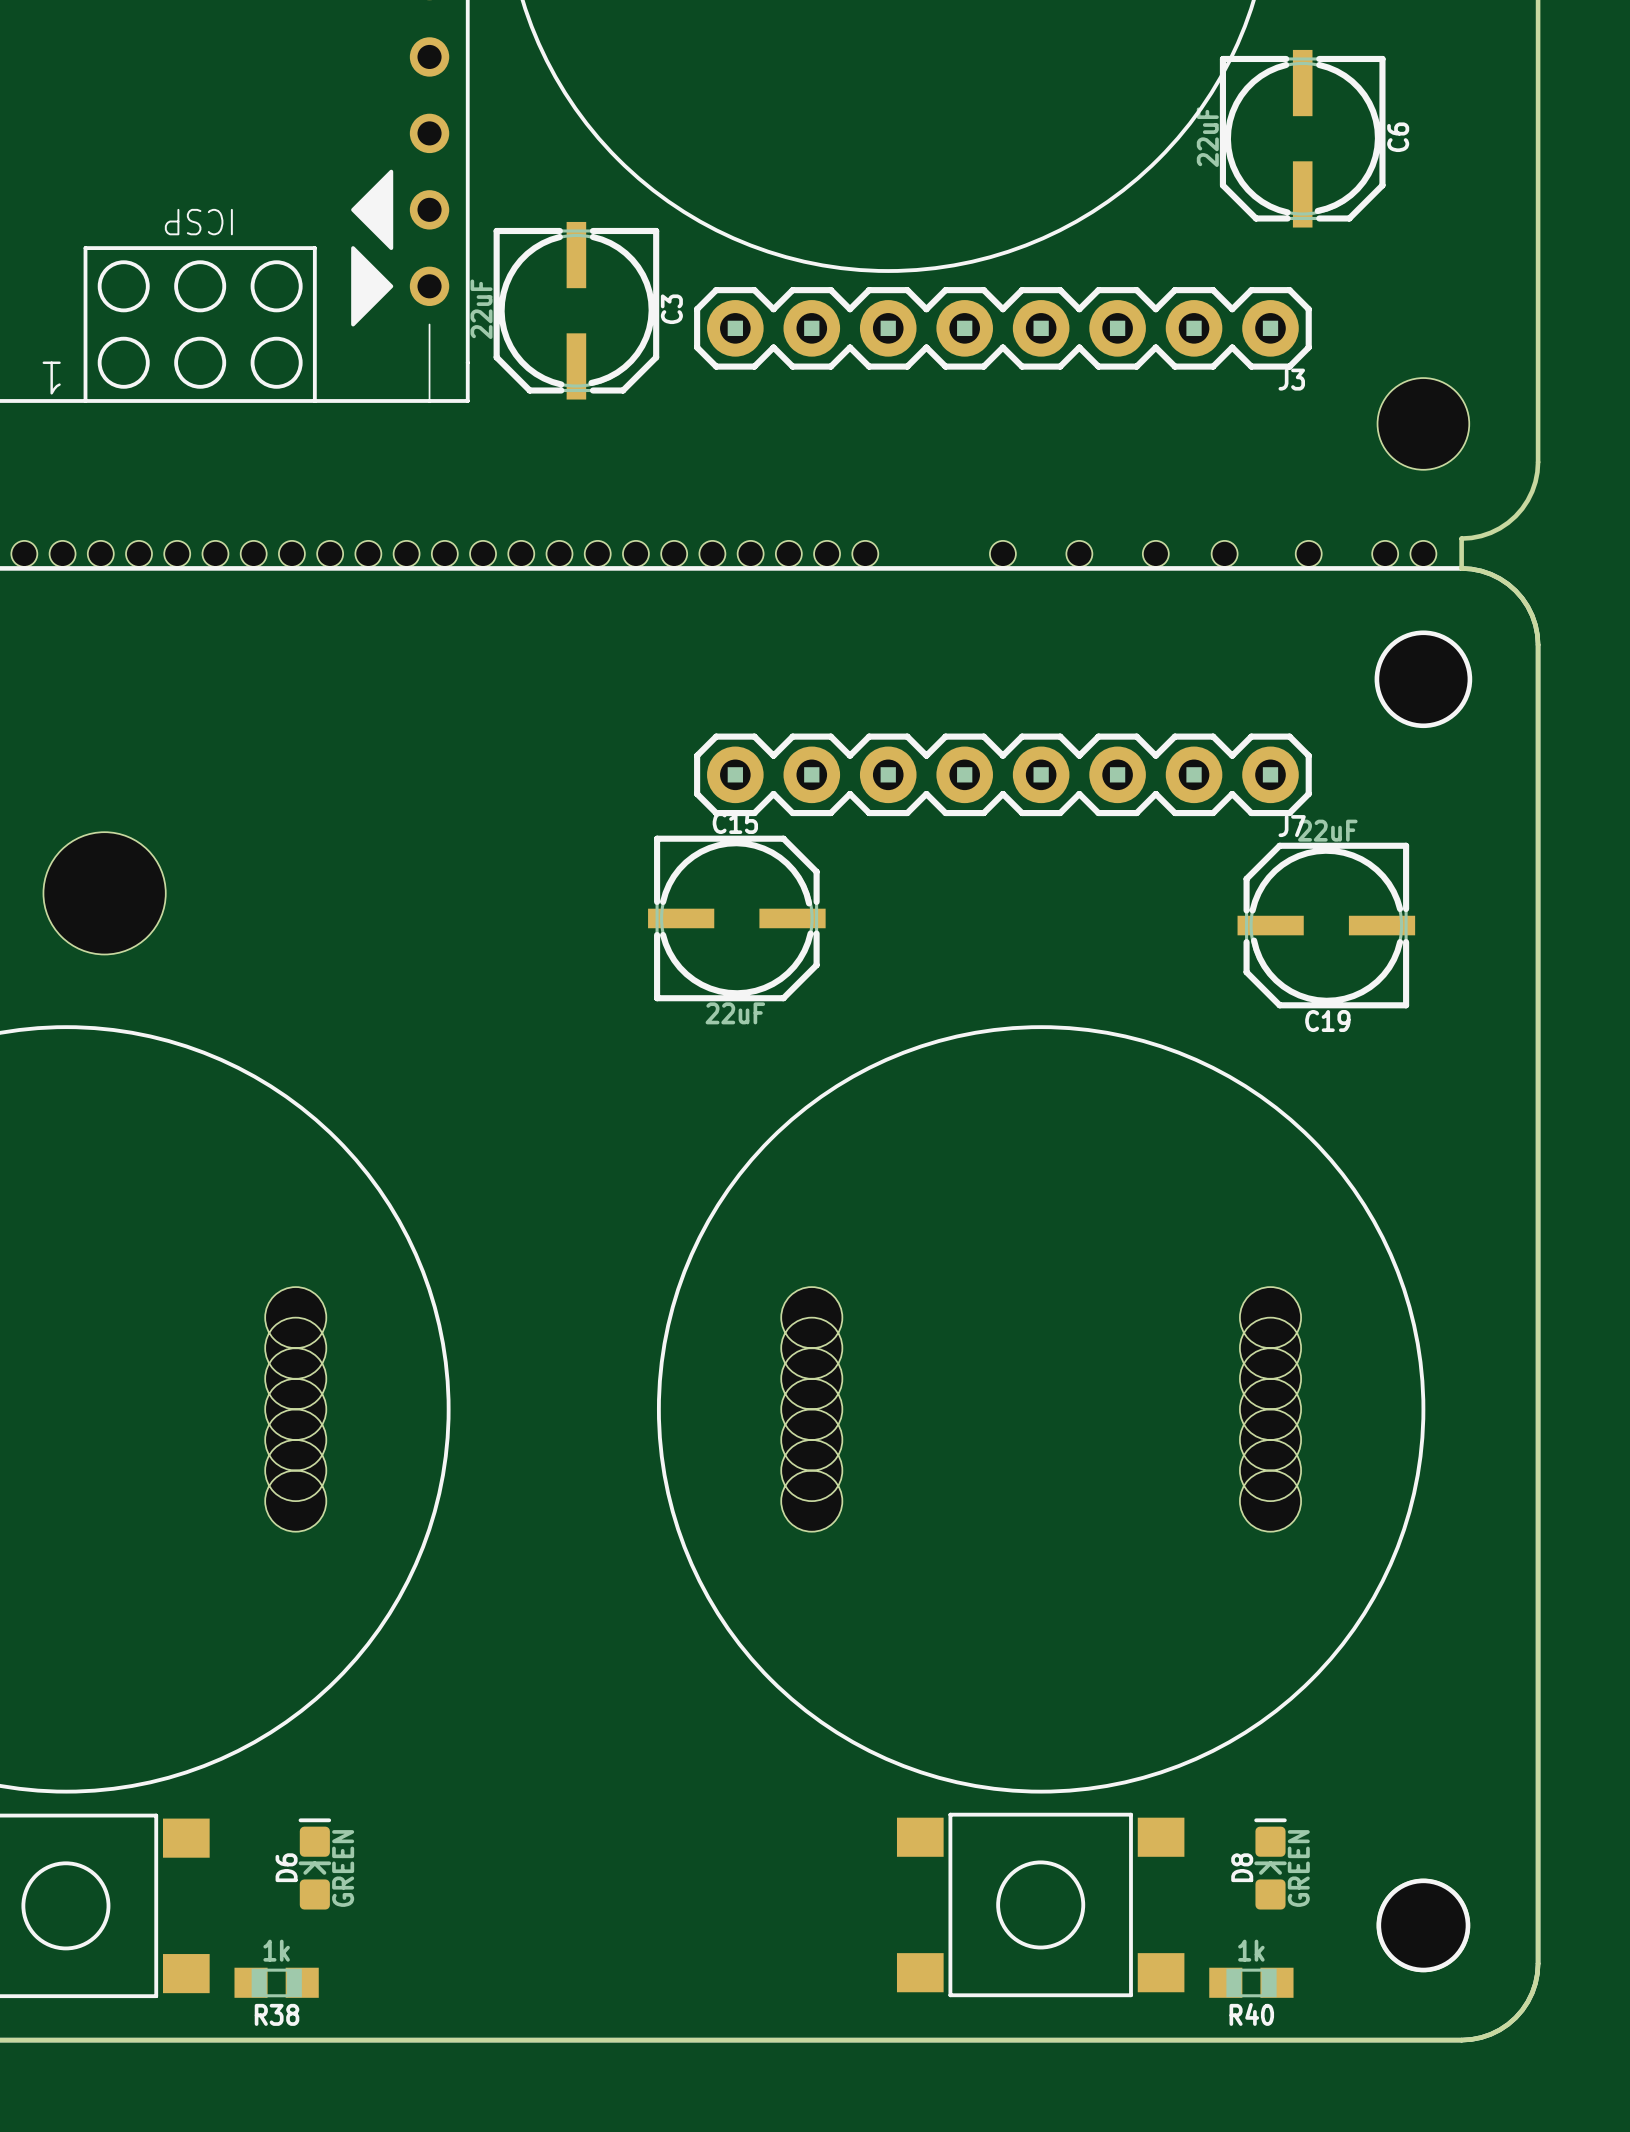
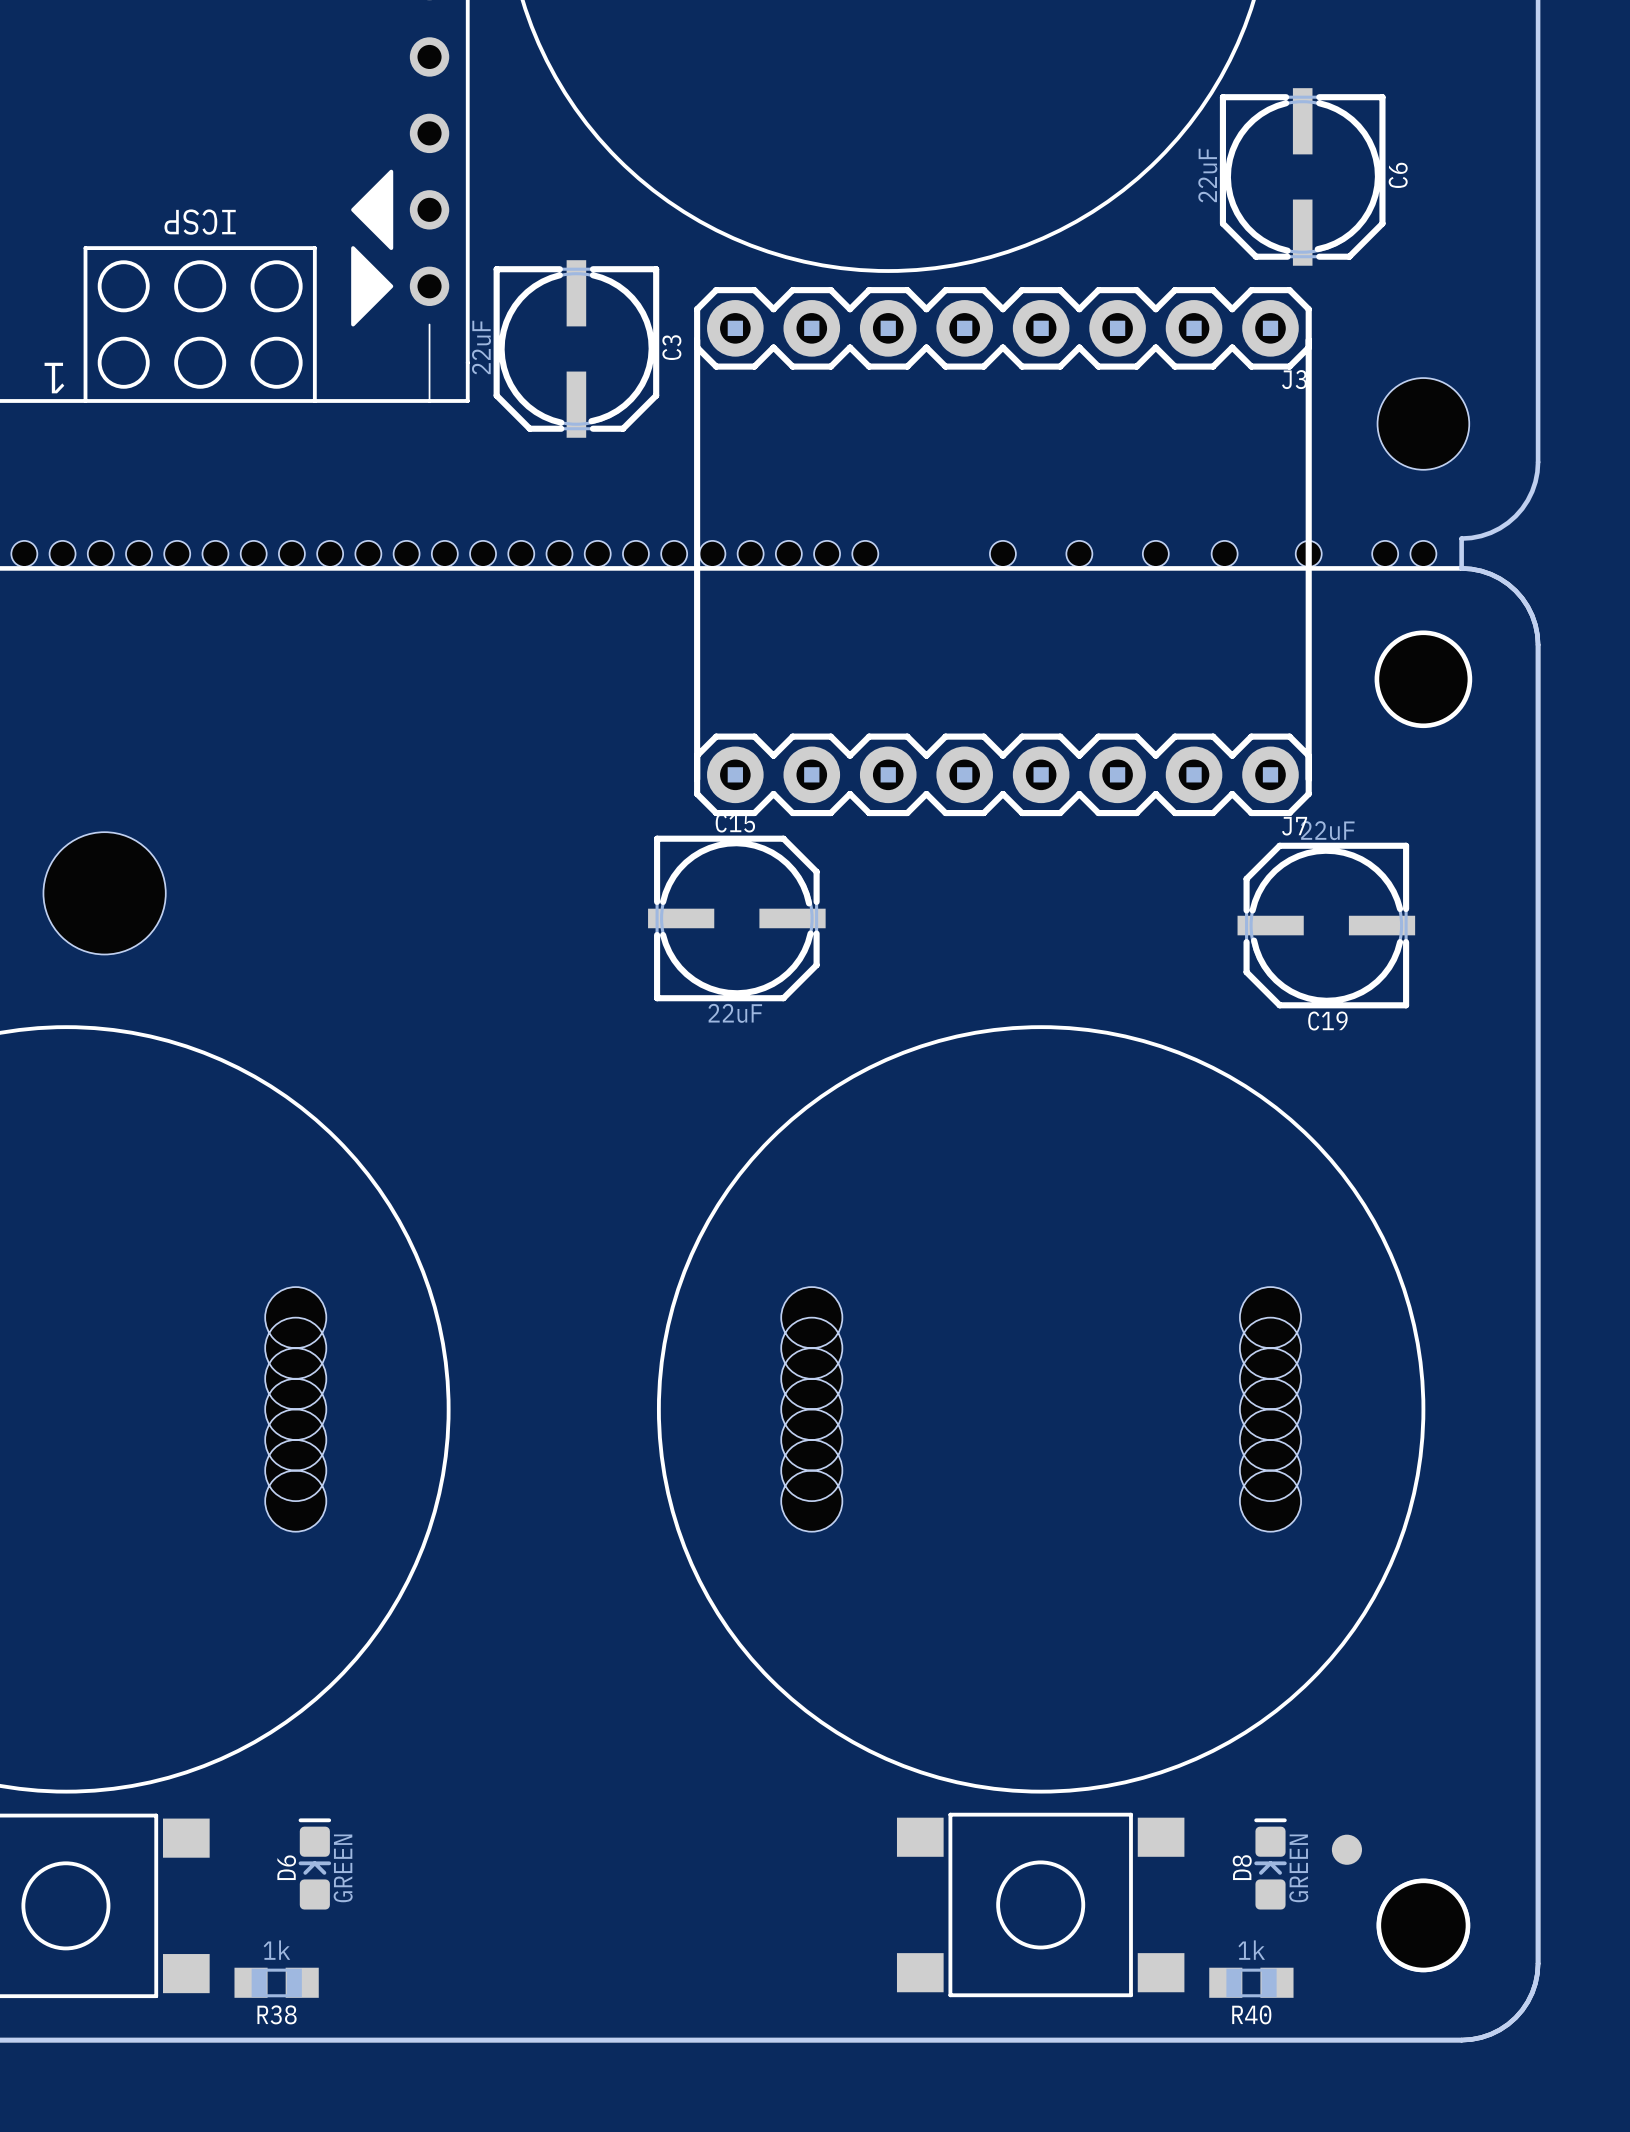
C6 position: (1302, 138) -> (1302, 176)
C3 position: (576, 310) -> (576, 348)
line: none -> (697, 339) (697, 779)
line: none -> (1308, 339) (1308, 779)
part: none -> (1346, 1849)

